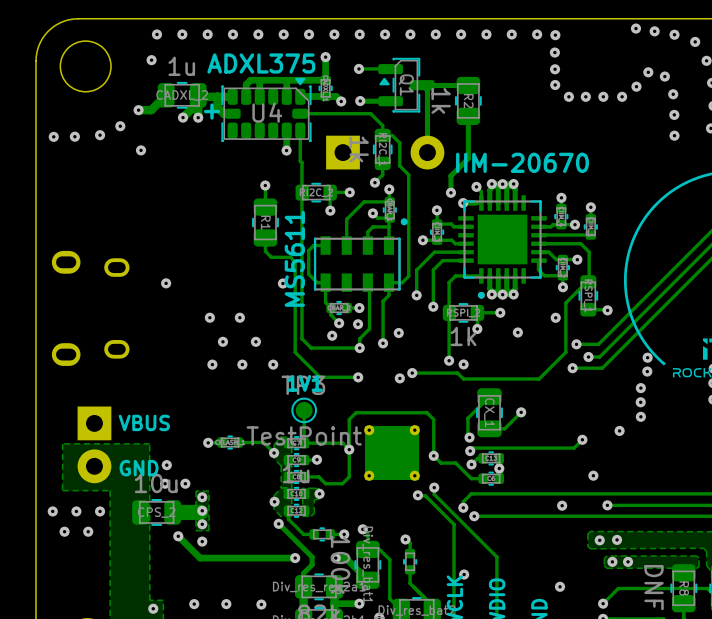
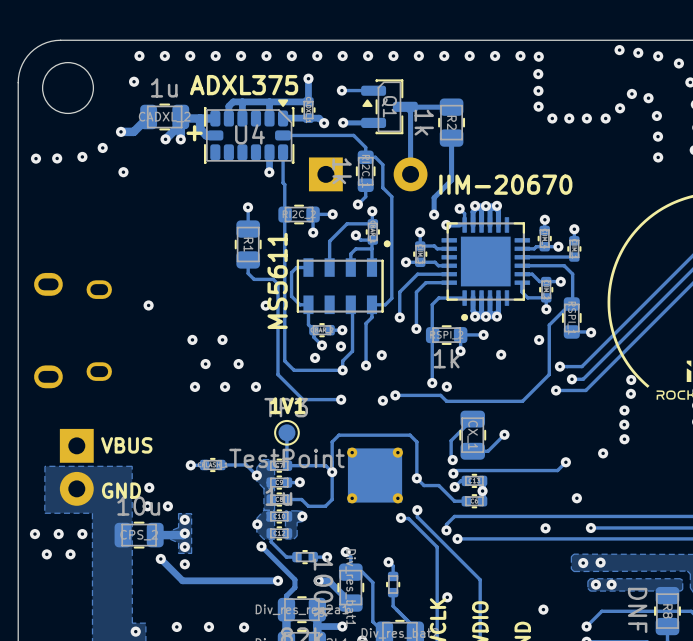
track width: thick (200, 512) (172, 512) -> thin (183, 535) (155, 535)

